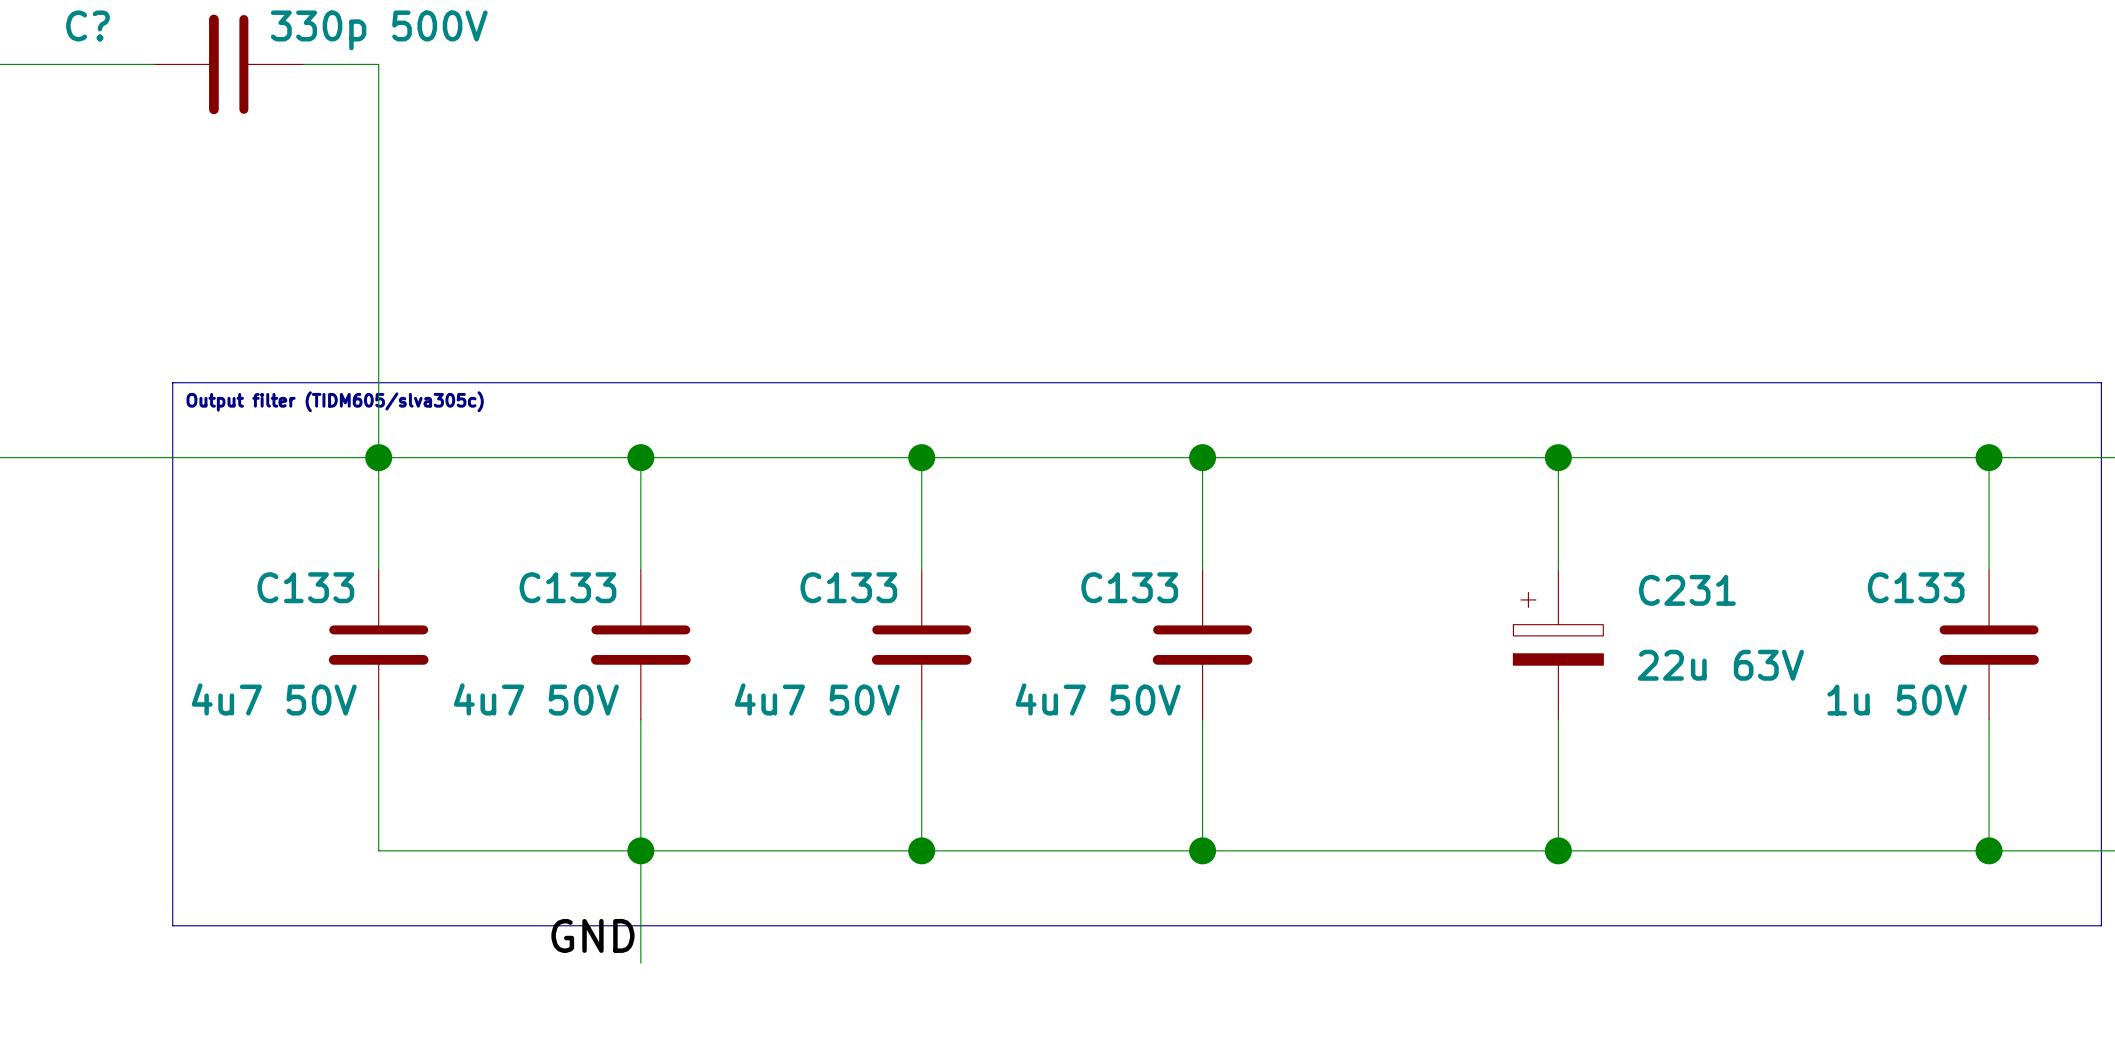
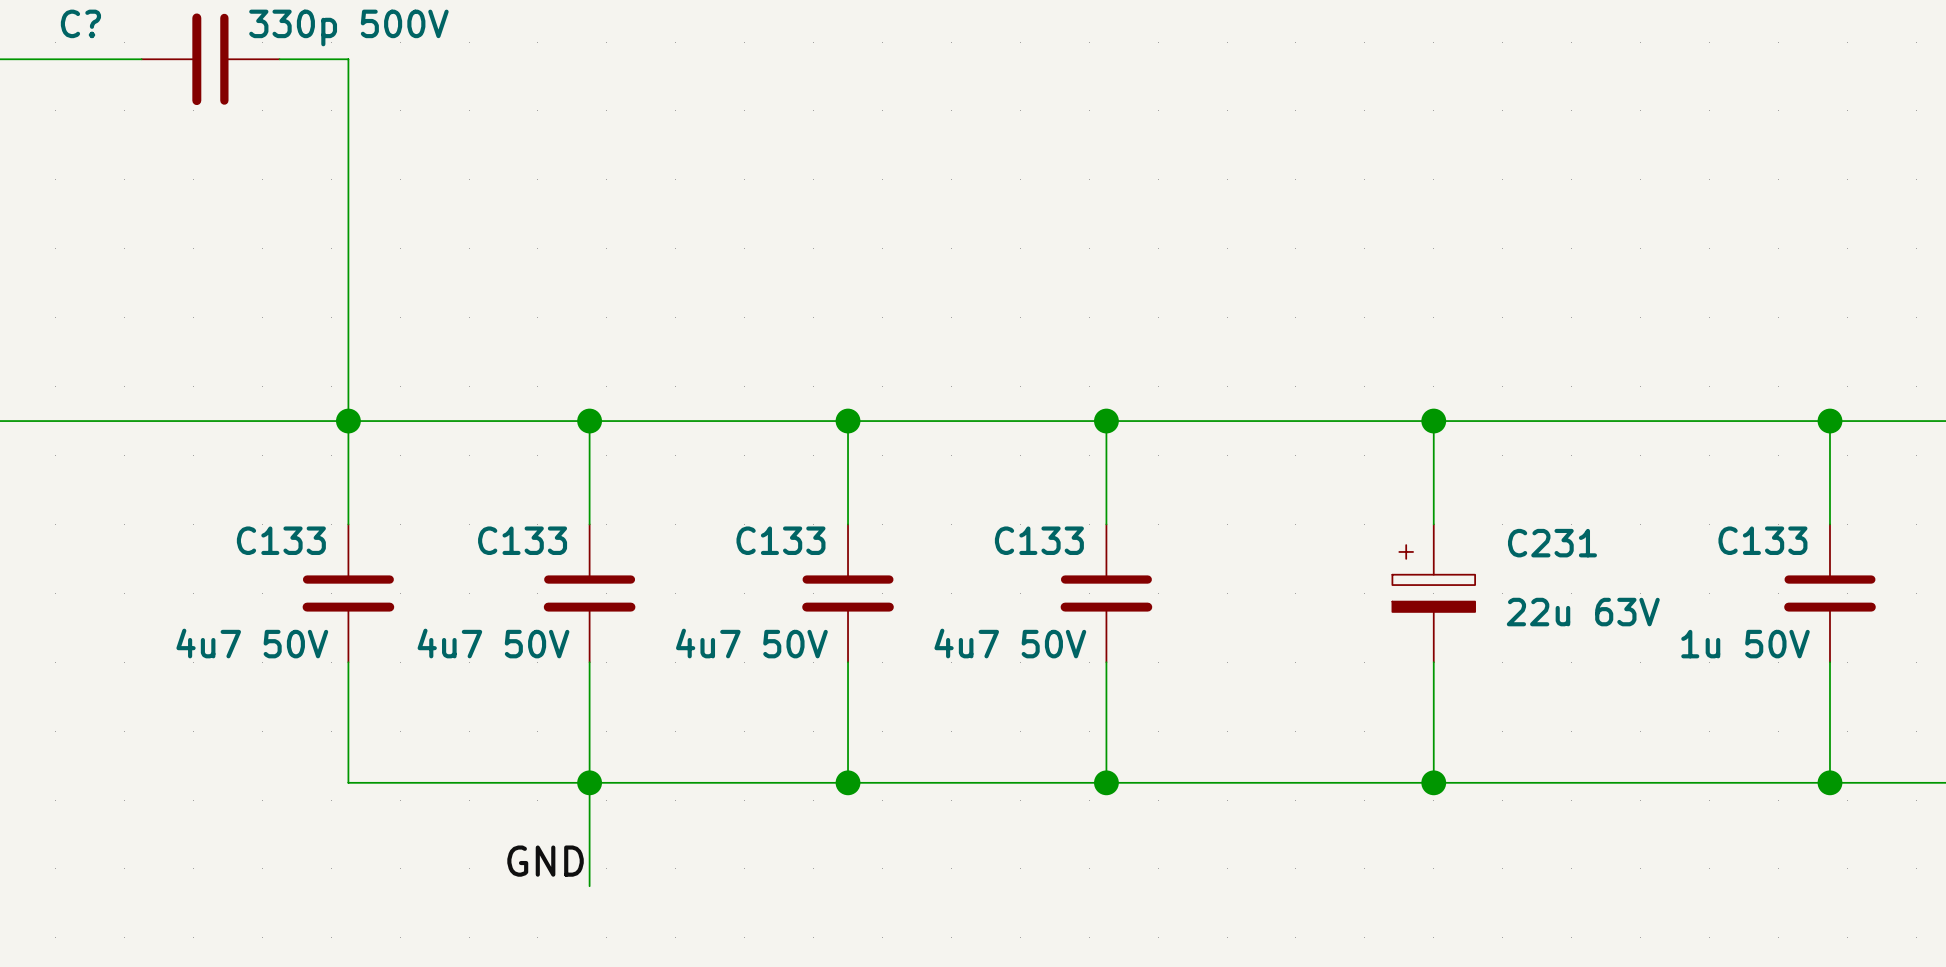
line: (172, 382) (2101, 382) (2101, 925) (172, 925) (172, 382) -> none
text: Output filter (TIDM605/slva305c) (335, 401) -> none

